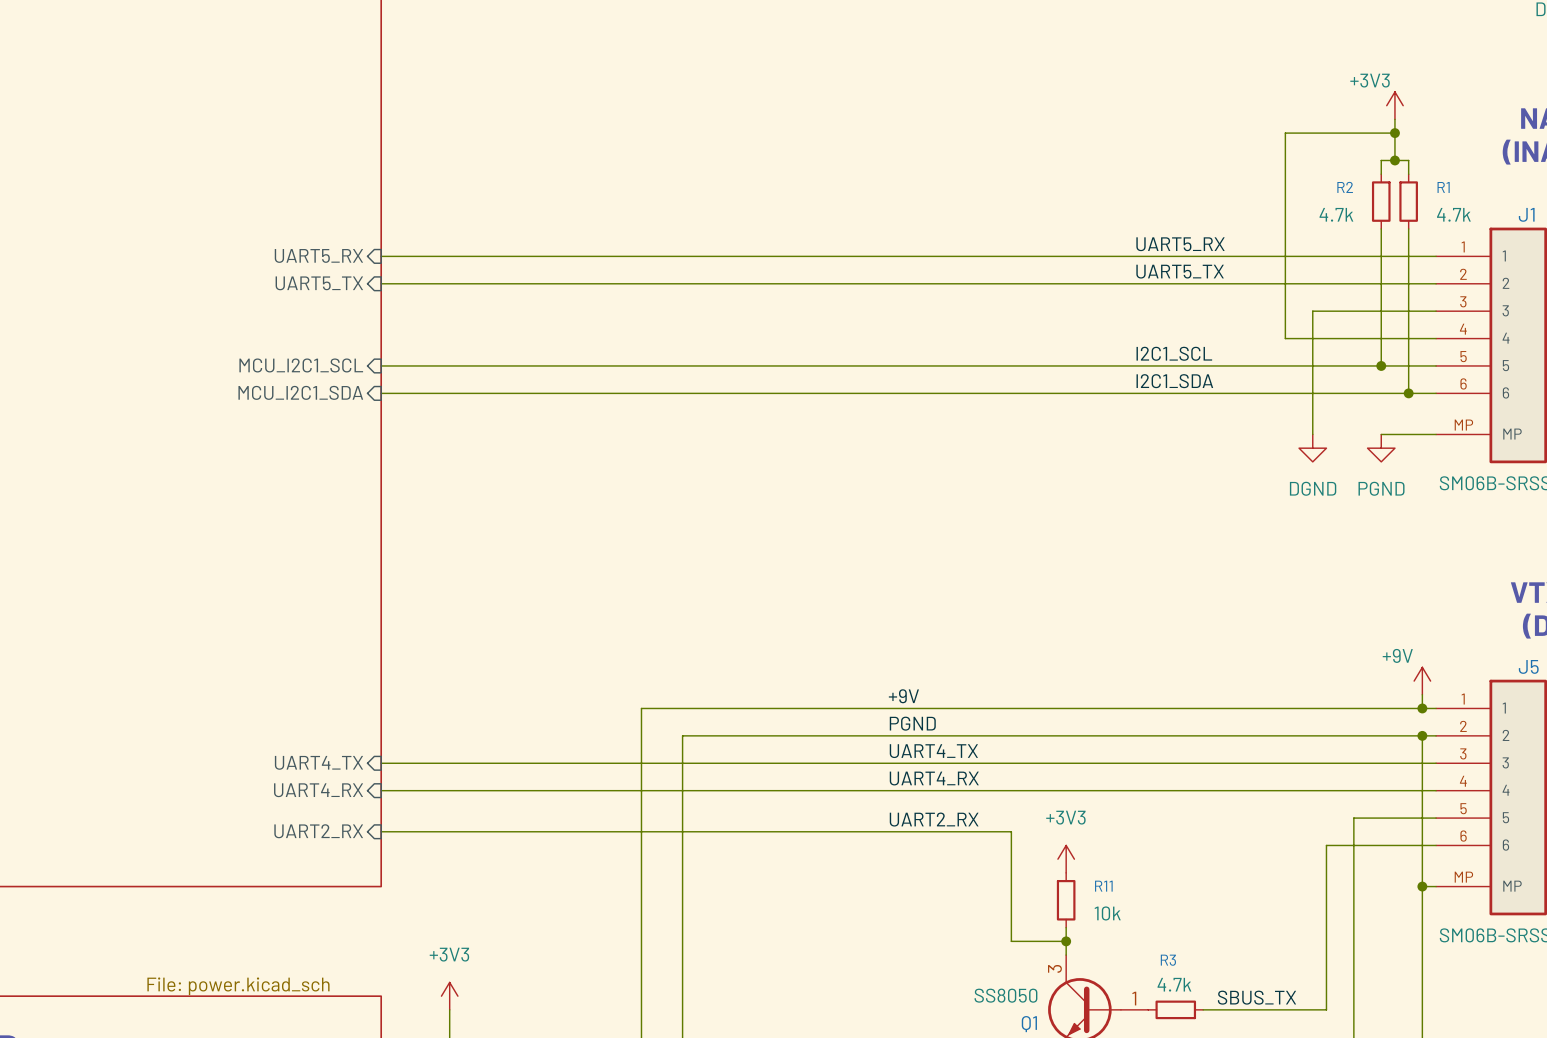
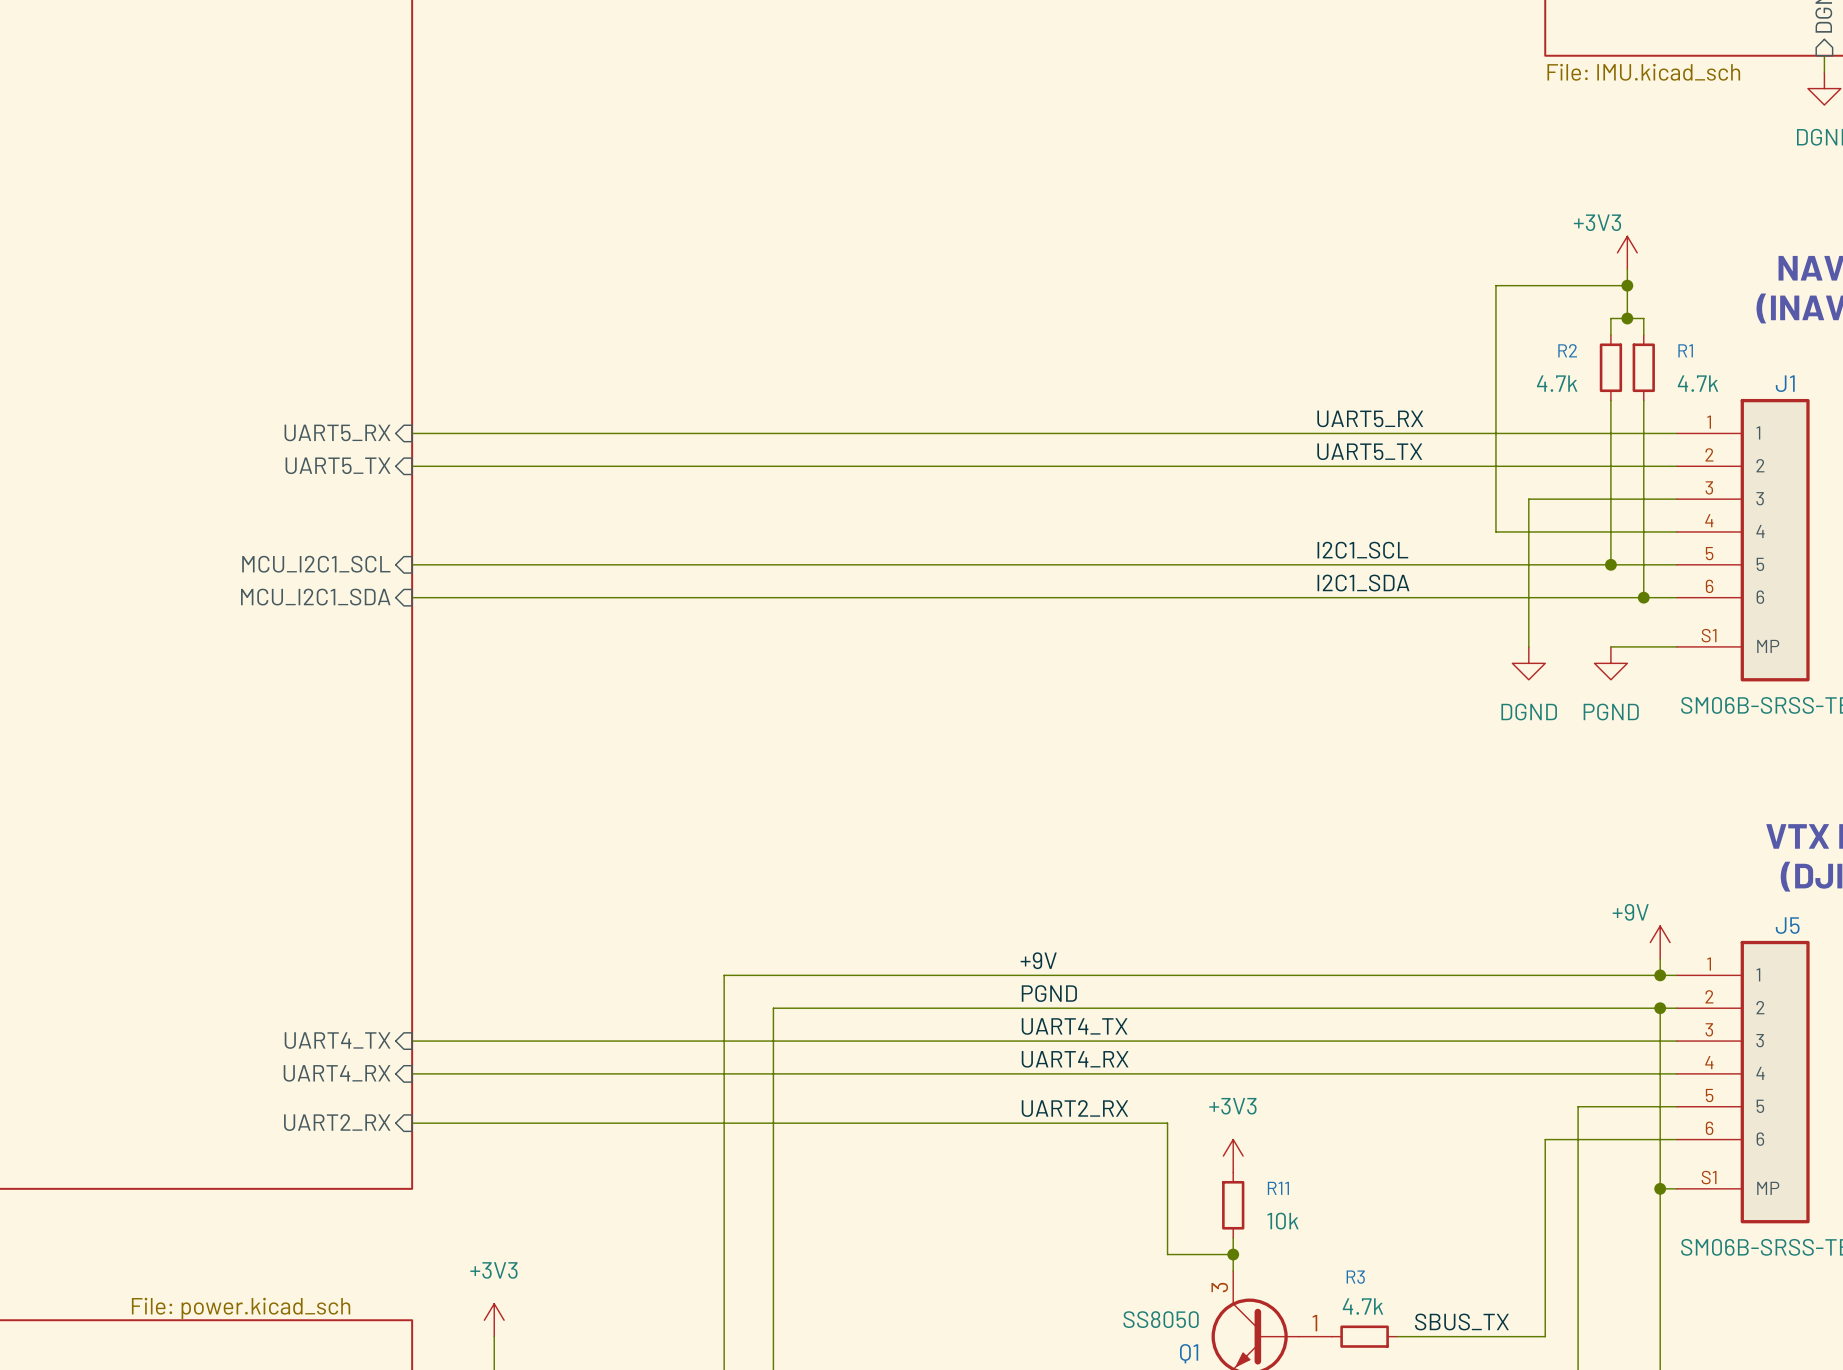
J1 pin number: MP (1463, 425) -> S1 (1709, 635)
J5 pin number: MP (1463, 877) -> S1 (1709, 1177)

